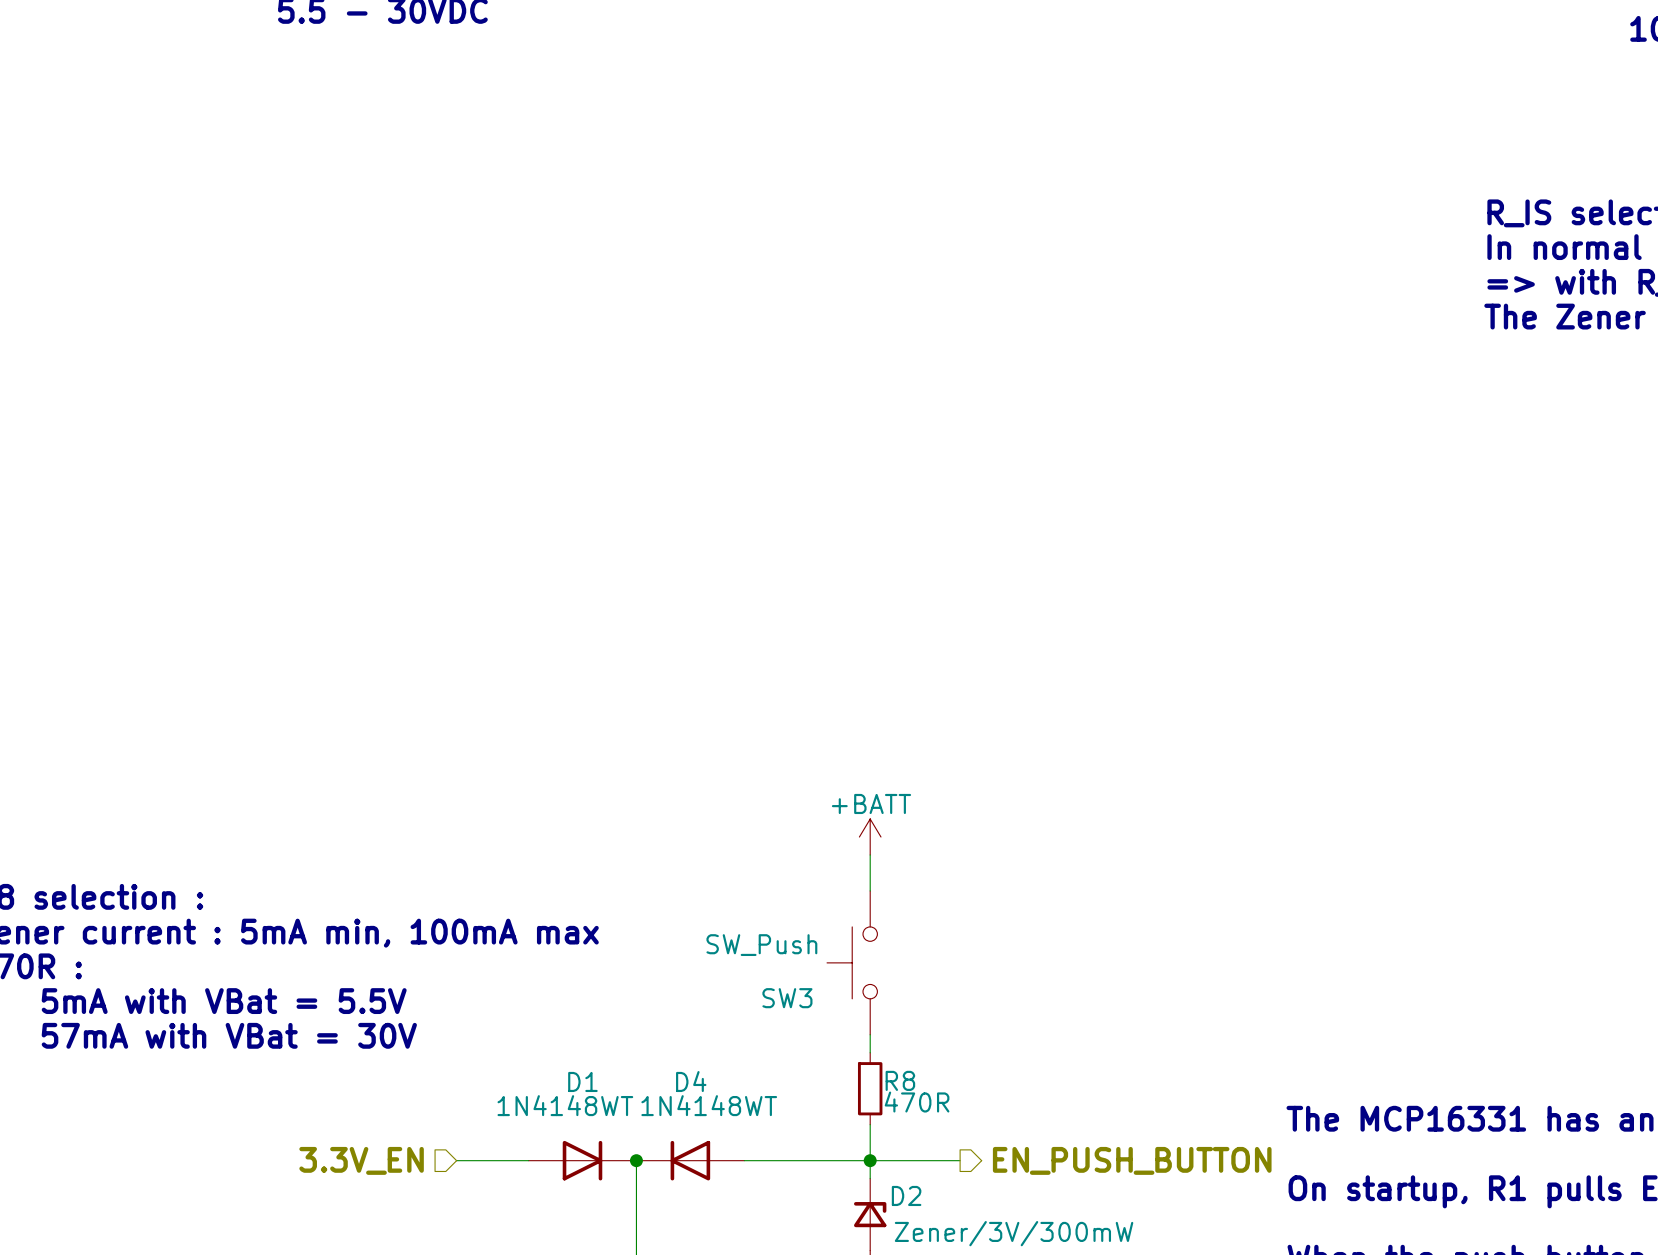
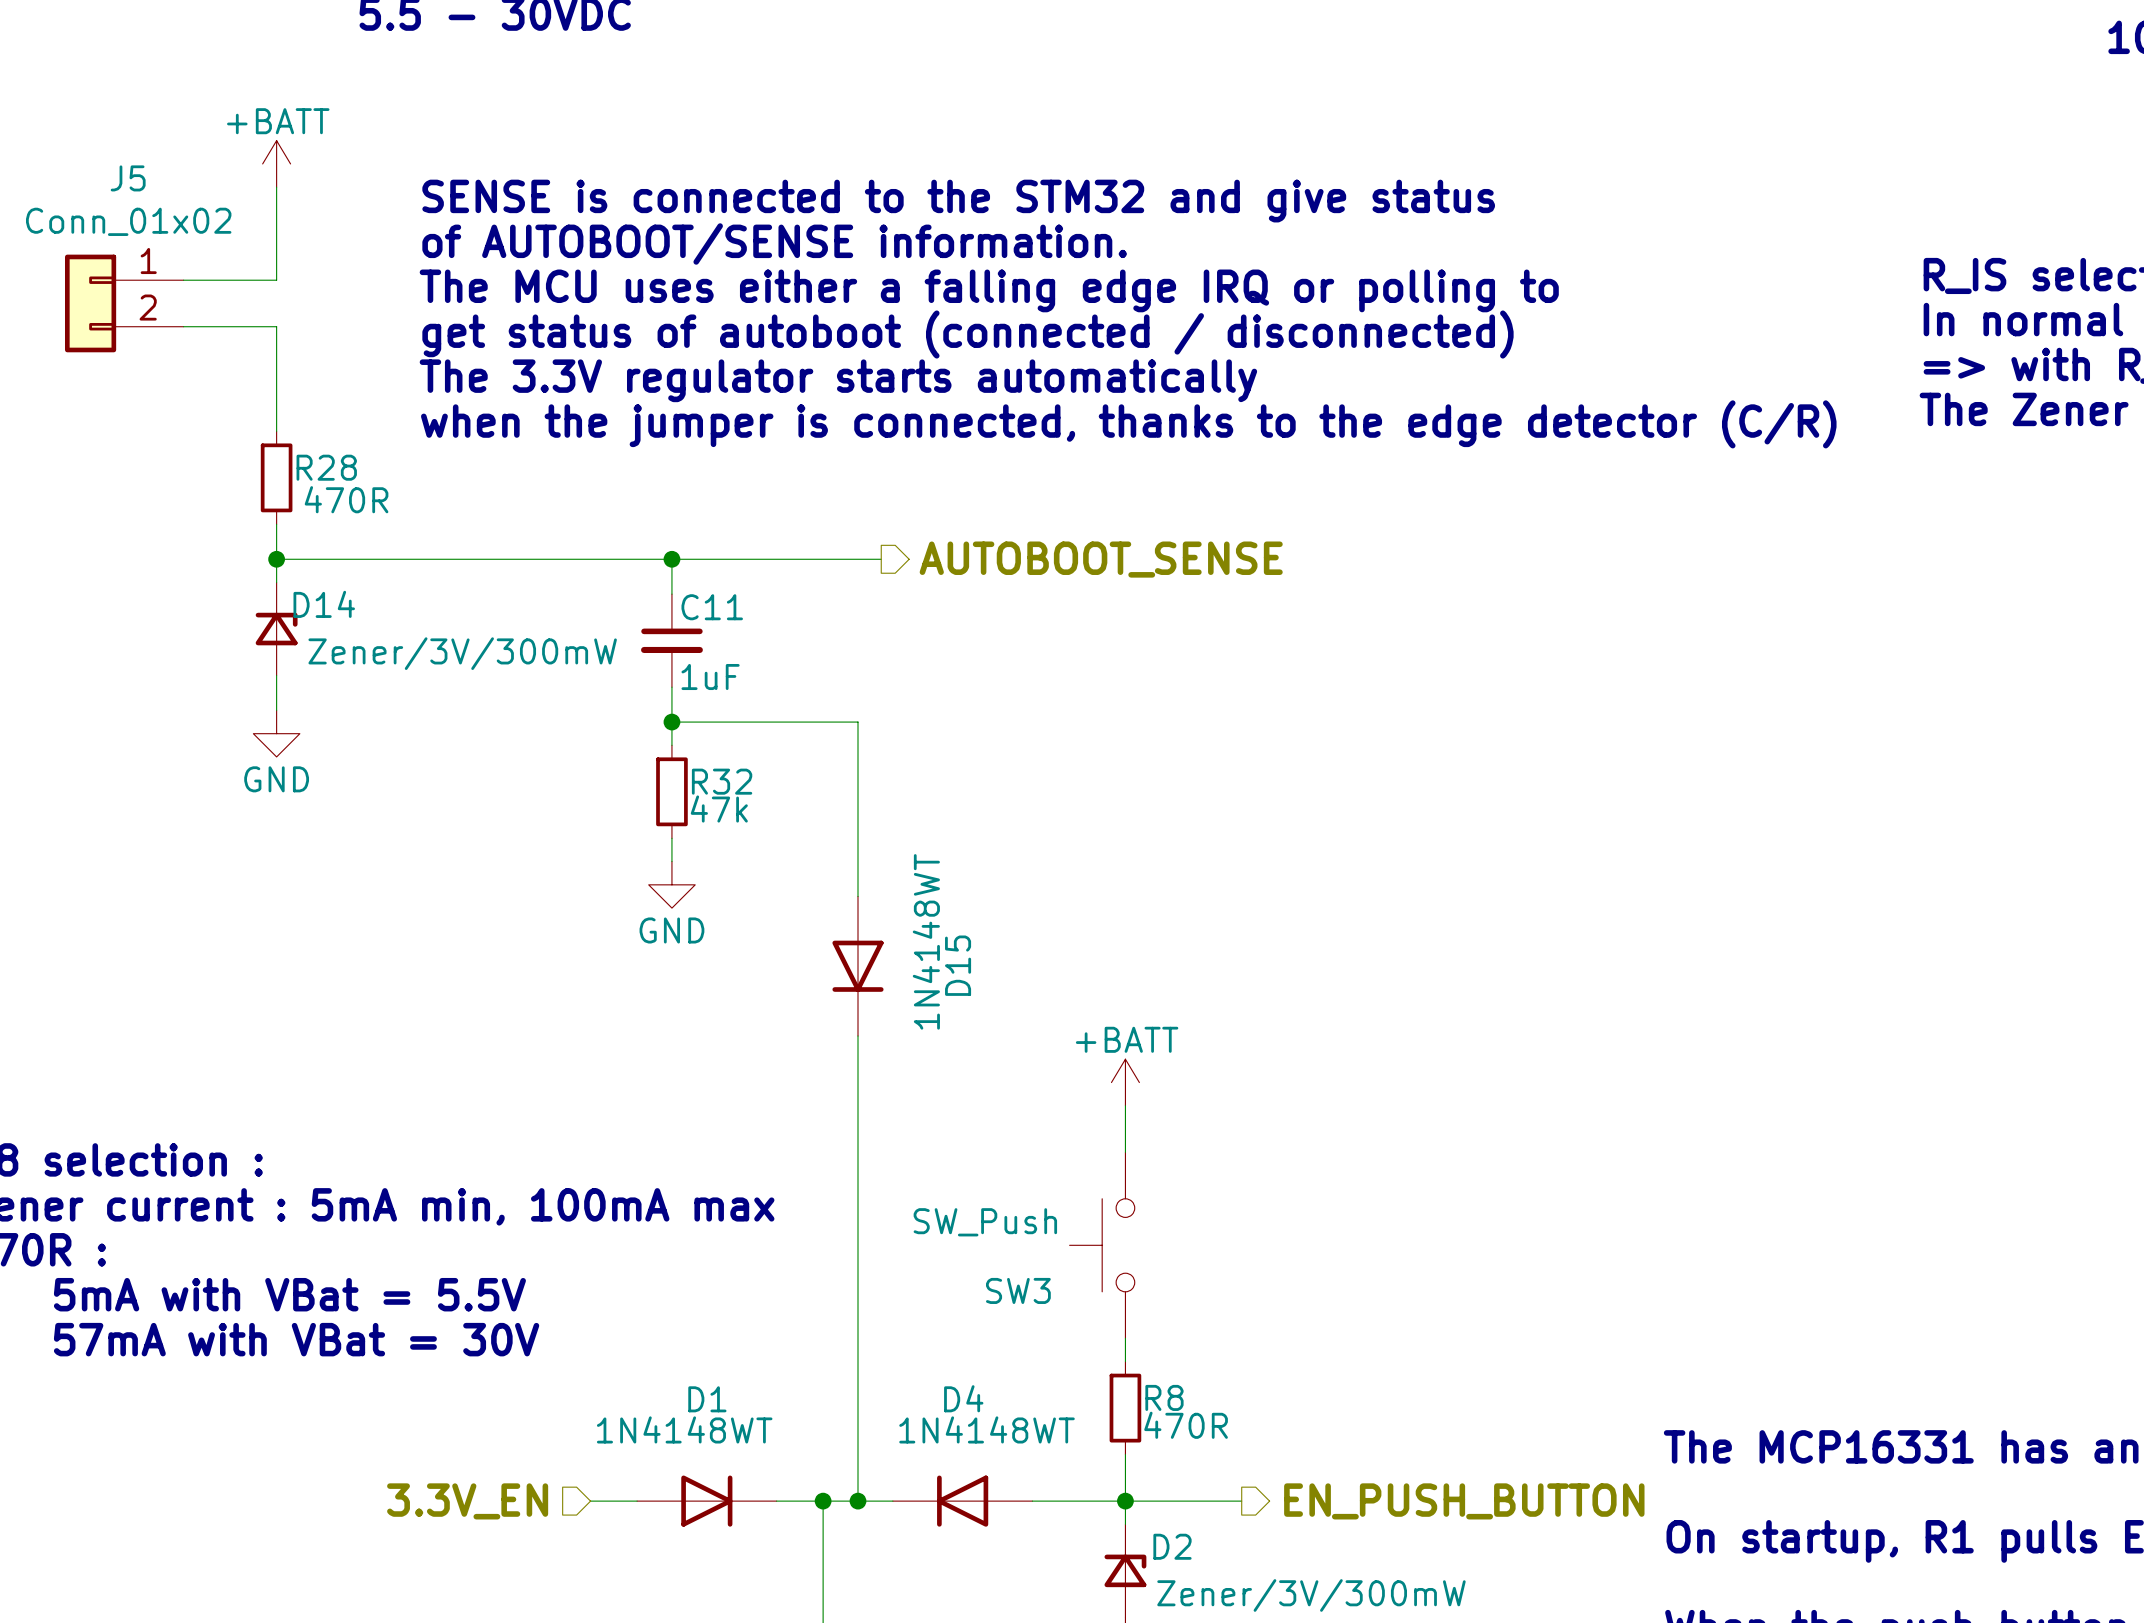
power symbol: none -> +BATT (276, 163)
wire: none -> (276, 187) (276, 280) (183, 280)
text: none -> SENSE is connected to the STM32 and give status (958, 201)
text: none -> of AUTOBOOT/SENSE information. (774, 243)
text: none -> The MCU uses either a falling edge IRQ or polling to (989, 290)
J5: none -> Conn_01x02 (124, 303)
wire: none -> (183, 326) (276, 326) (276, 431)
text: none -> get status of autoboot (connected / disconnected) (967, 334)
text: none -> The 3.3V regulator starts automatically (838, 380)
text: none -> when the jumper is connected, thanks to the edge detector (C/R) (1128, 424)
R28: none -> 470R (276, 477)
wire: none -> (276, 524) (276, 582)
wire: none -> (276, 559) (881, 559)
junction: none -> (276, 559)
wire: none -> (671, 559) (671, 594)
junction: none -> (671, 559)
hierarchical label: none -> AUTOBOOT_SENSE (1101, 559)
D14: none -> Zener/3V/300mW (276, 629)
C11: none -> 1uF (671, 640)
wire: none -> (276, 675) (276, 710)
wire: none -> (671, 687) (671, 745)
wire: none -> (671, 722) (858, 722) (858, 896)
junction: none -> (671, 722)
power symbol: none -> GND (276, 733)
R32: none -> 47k (671, 791)
wire: none -> (671, 838) (671, 861)
power symbol: none -> GND (671, 884)
D15: none -> 1N4148WT (858, 966)
wire: none -> (858, 1036) (858, 1501)
D1 position: (582, 1160) -> (706, 1501)
junction: none -> (858, 1501)
D4 position: (690, 1160) -> (962, 1501)

